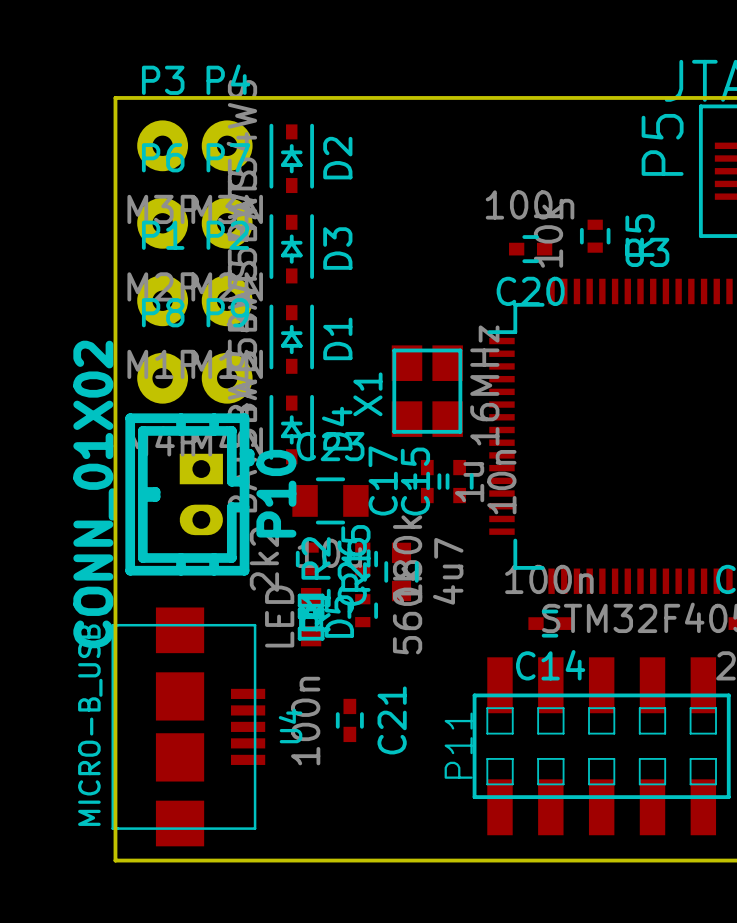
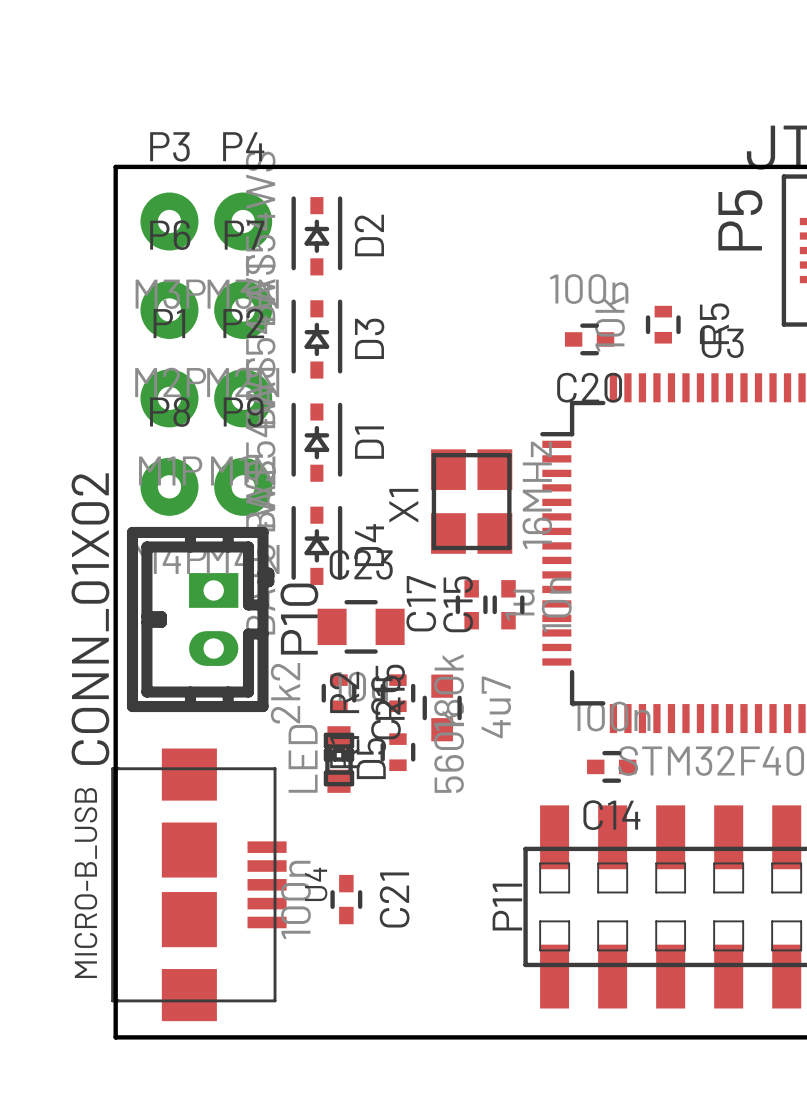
C21 position: (349, 720) -> (346, 899)

